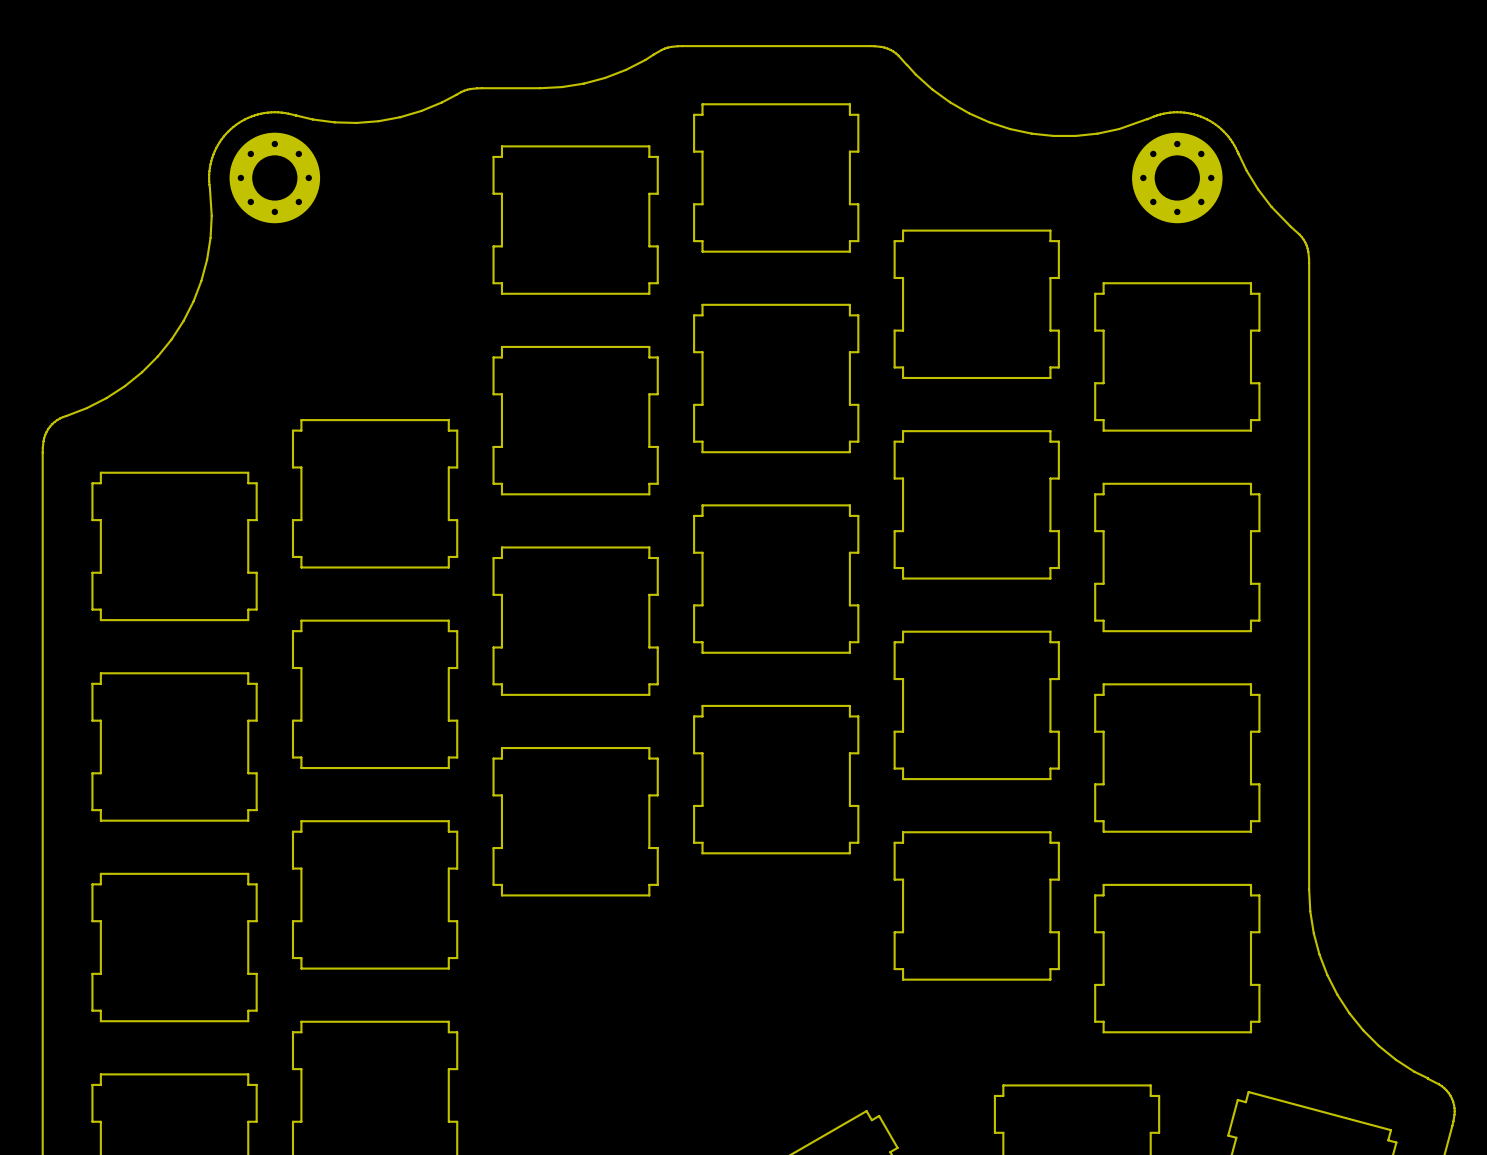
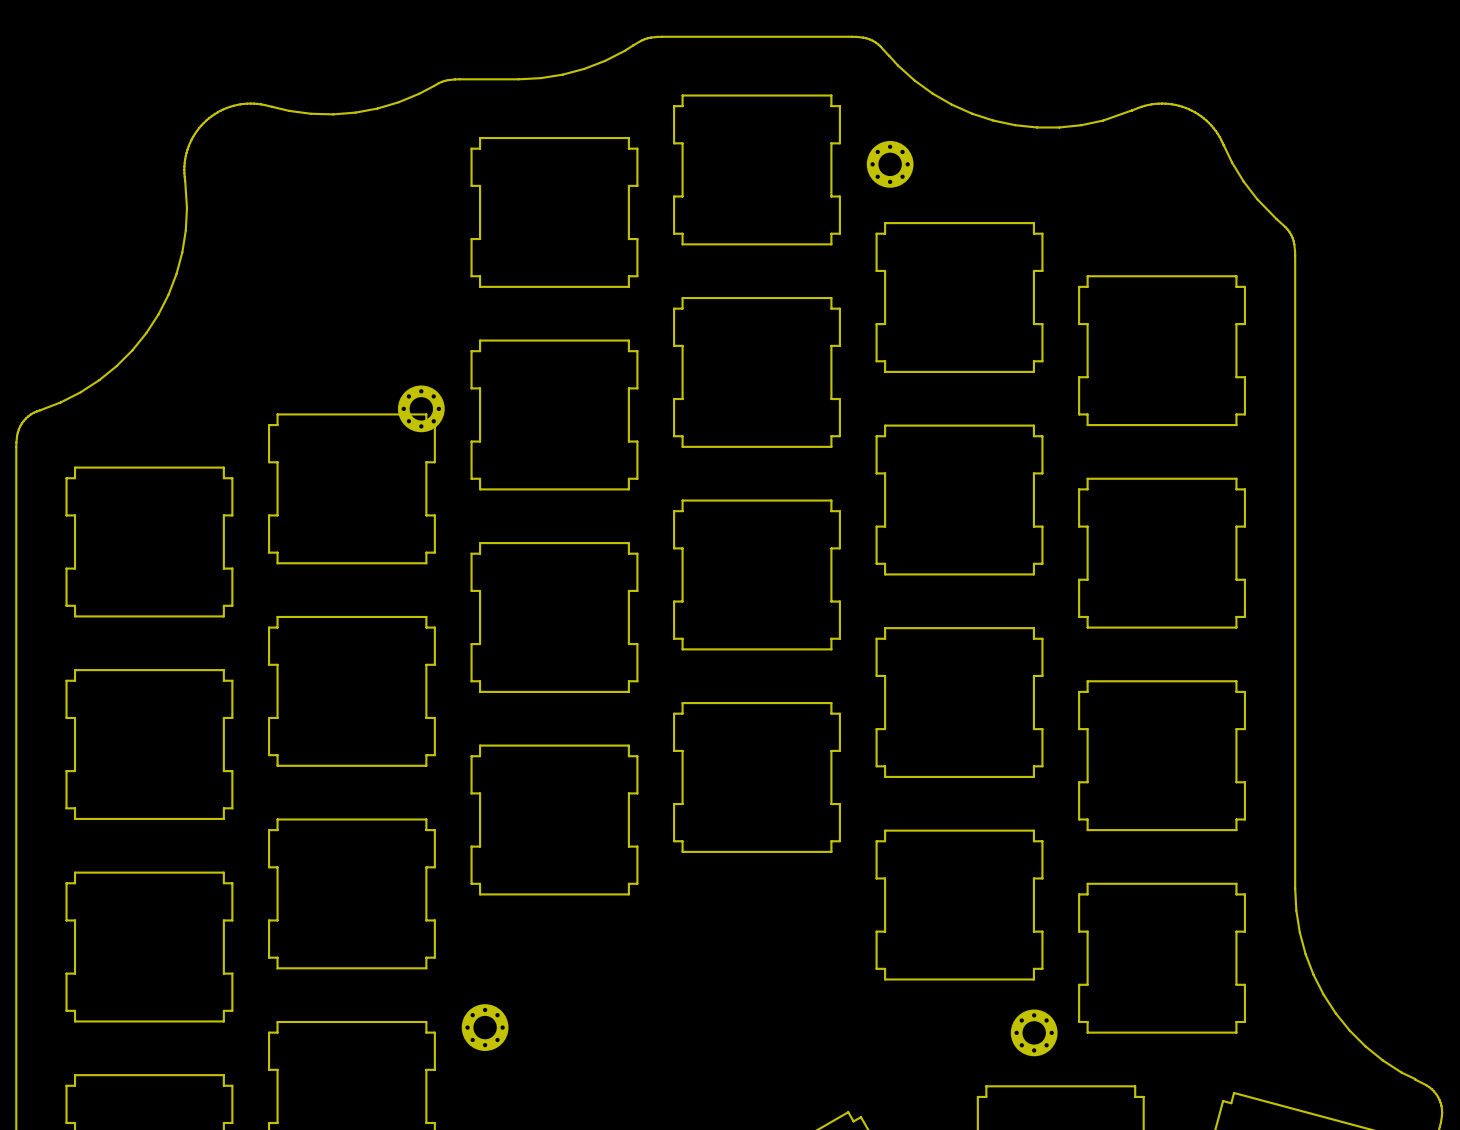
part: none -> (890, 164)
part: (274, 177) -> none
part: (1177, 177) -> none
part: none -> (421, 408)
part: none -> (485, 1027)
part: none -> (1034, 1032)

